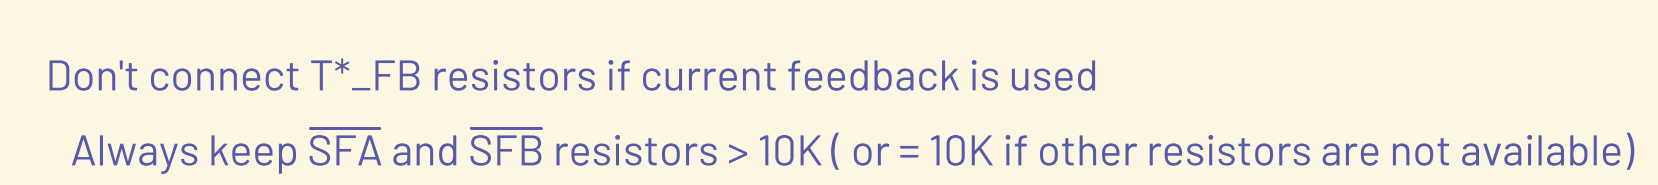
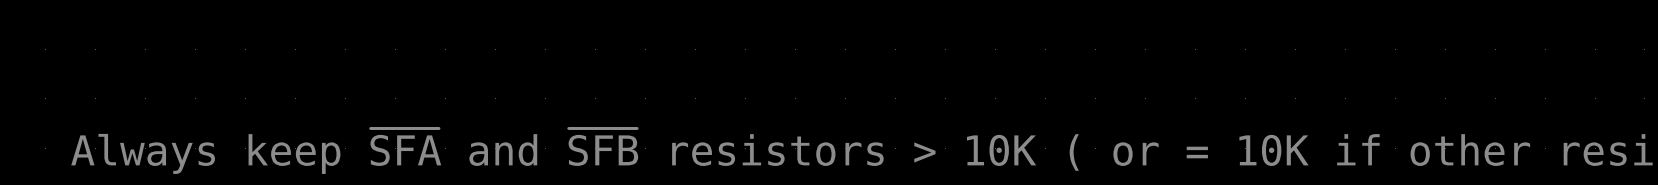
text: Don't connect T*_FB resistors if current feedback is used (572, 74) -> none

